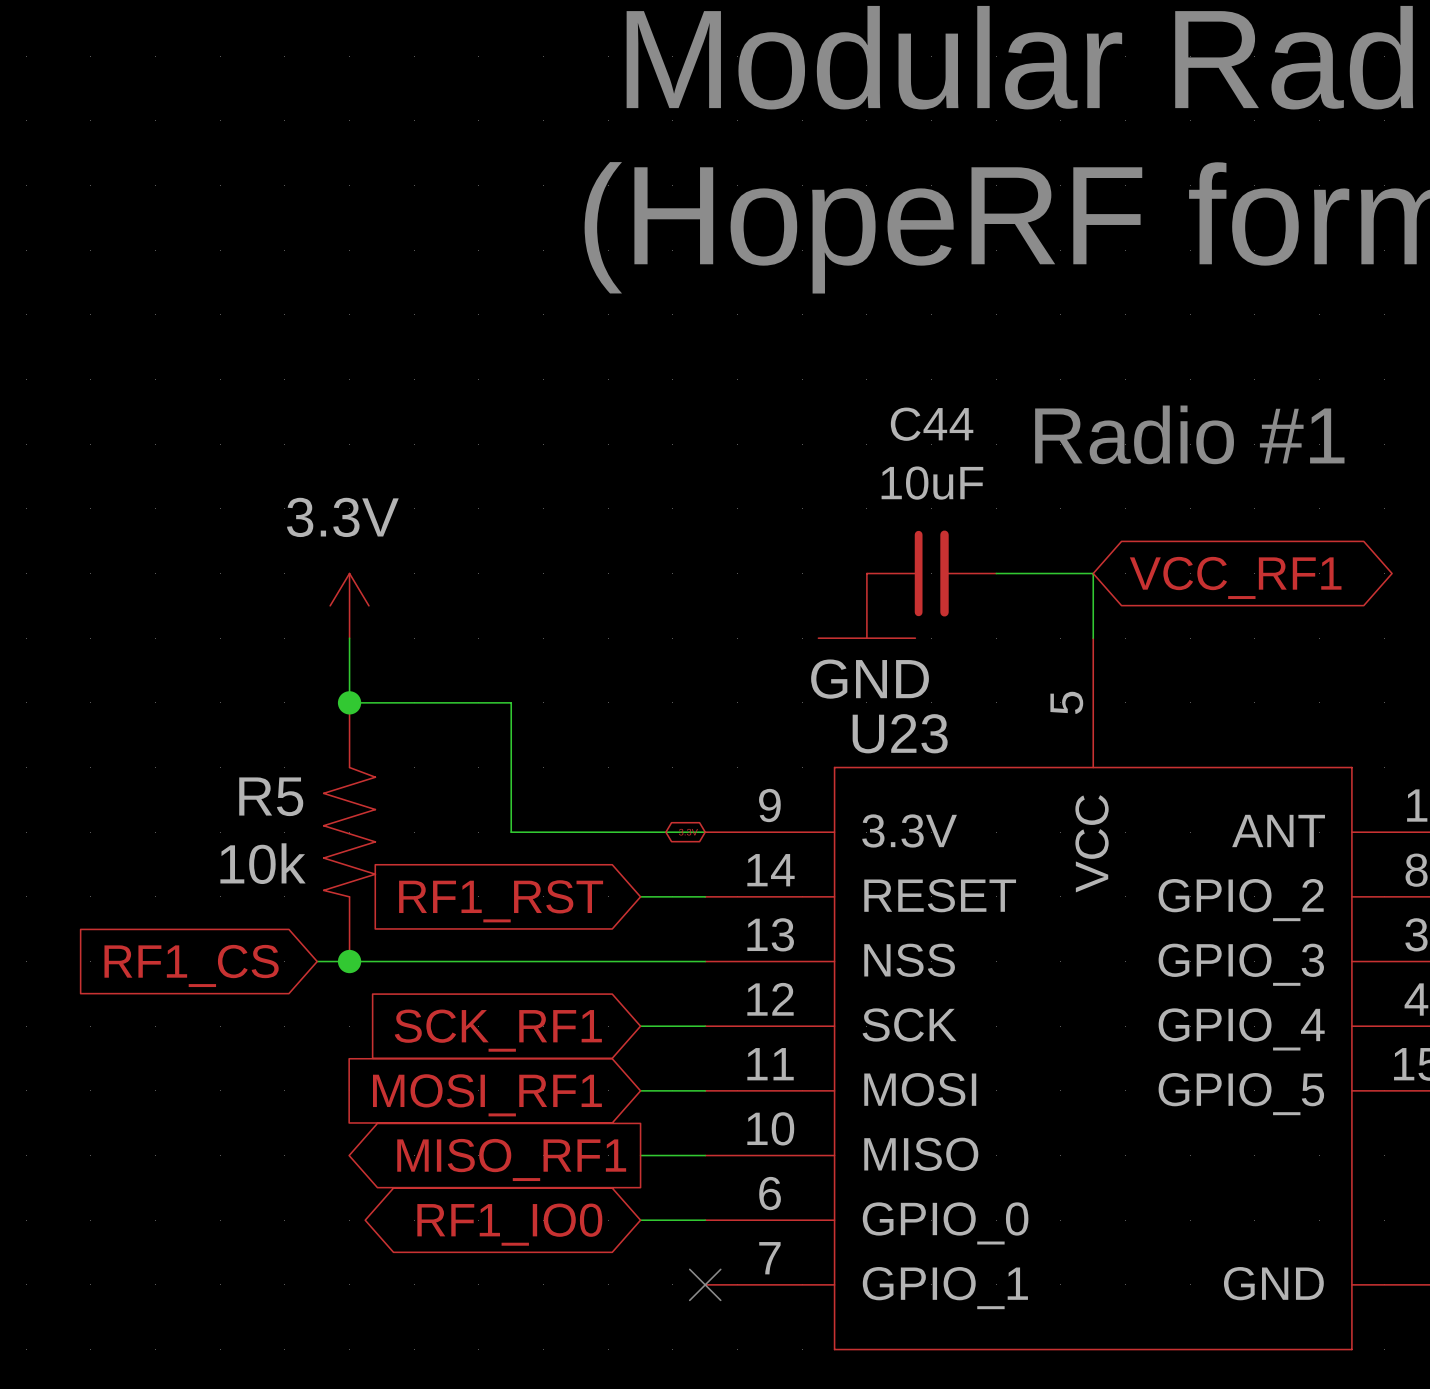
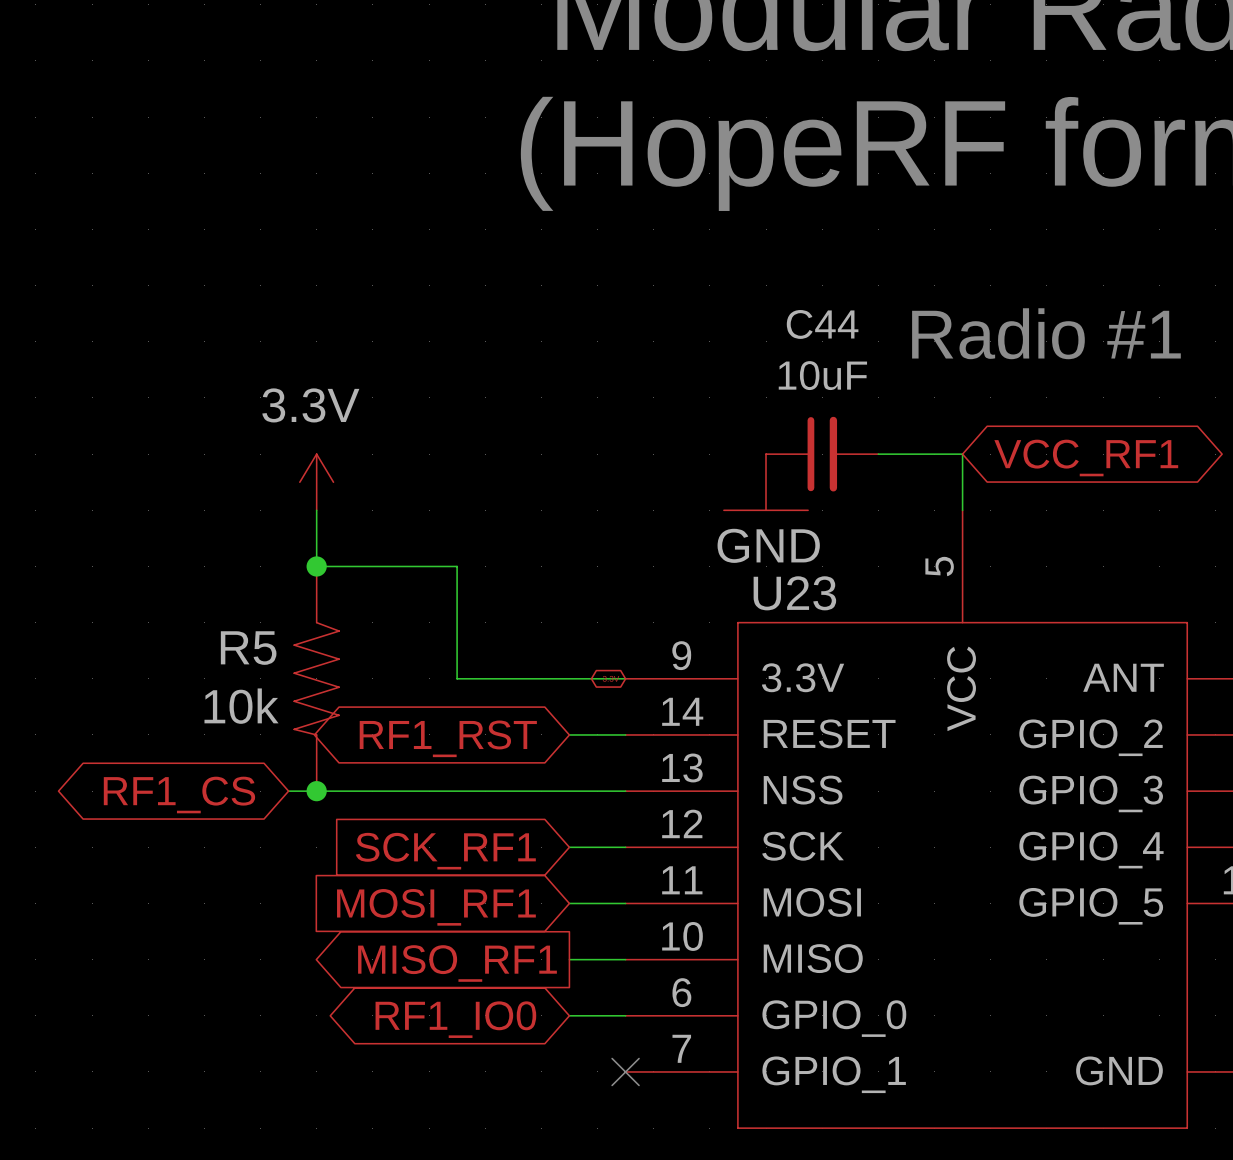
global label shape: input (501, 901) -> bidirectional (448, 738)
global label shape: input (191, 965) -> bidirectional (179, 794)

